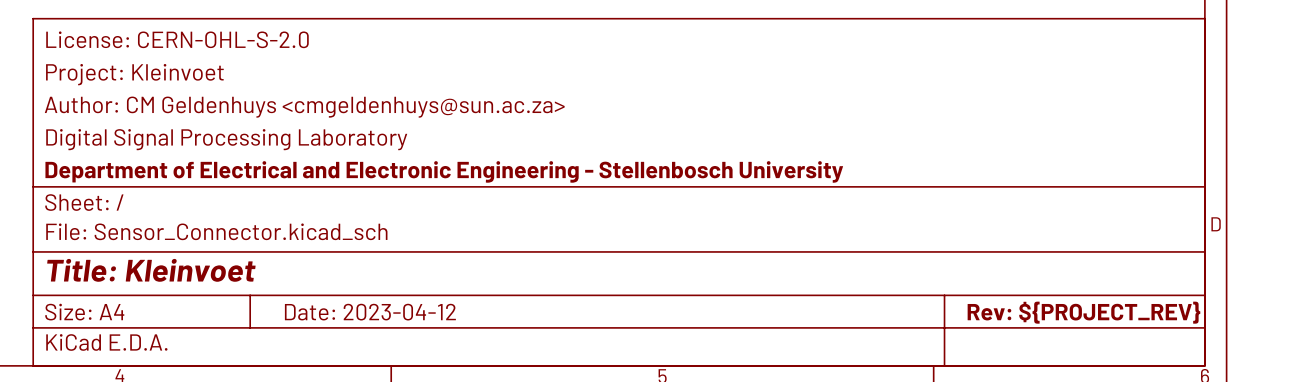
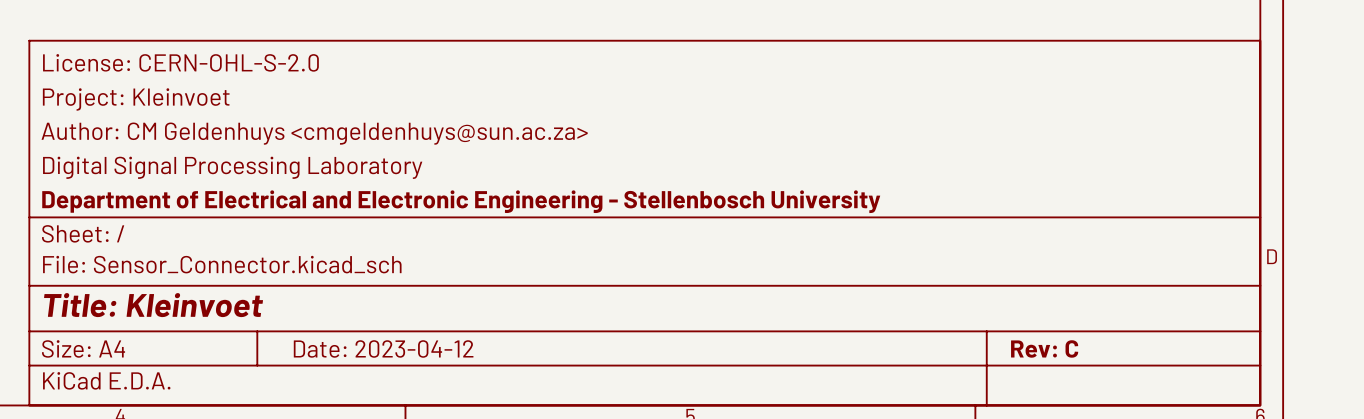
title block: Rev: ${PROJECT_REV} (1083, 312) -> Rev: C (1044, 348)

